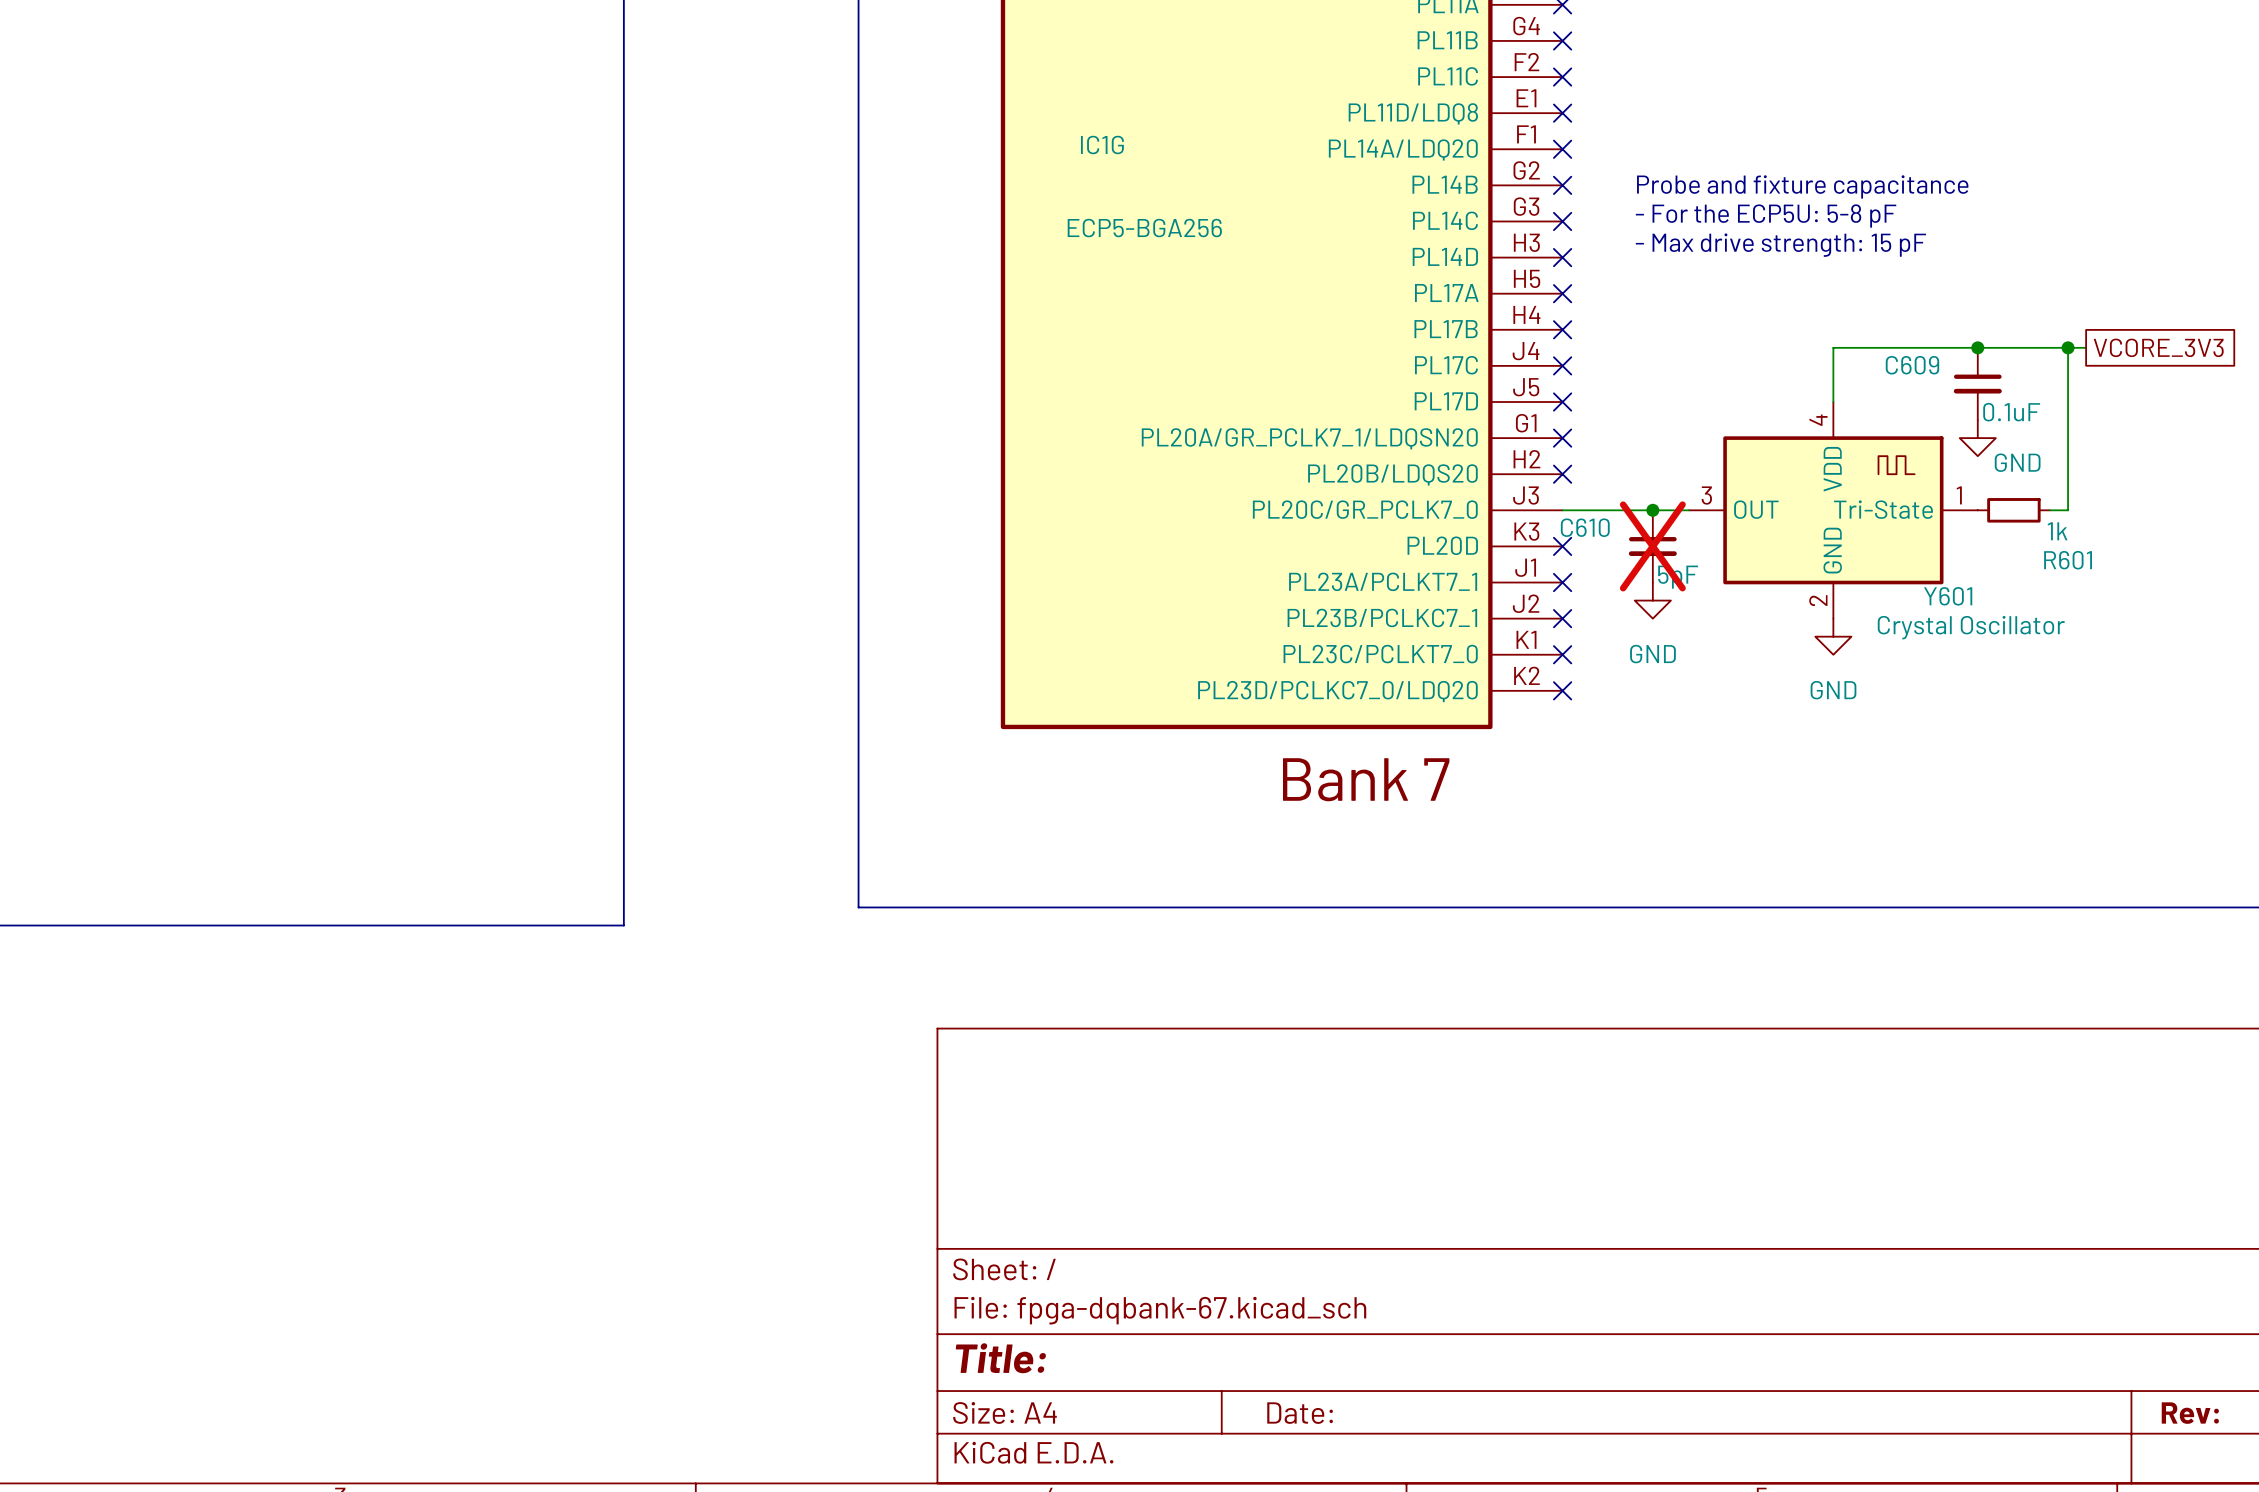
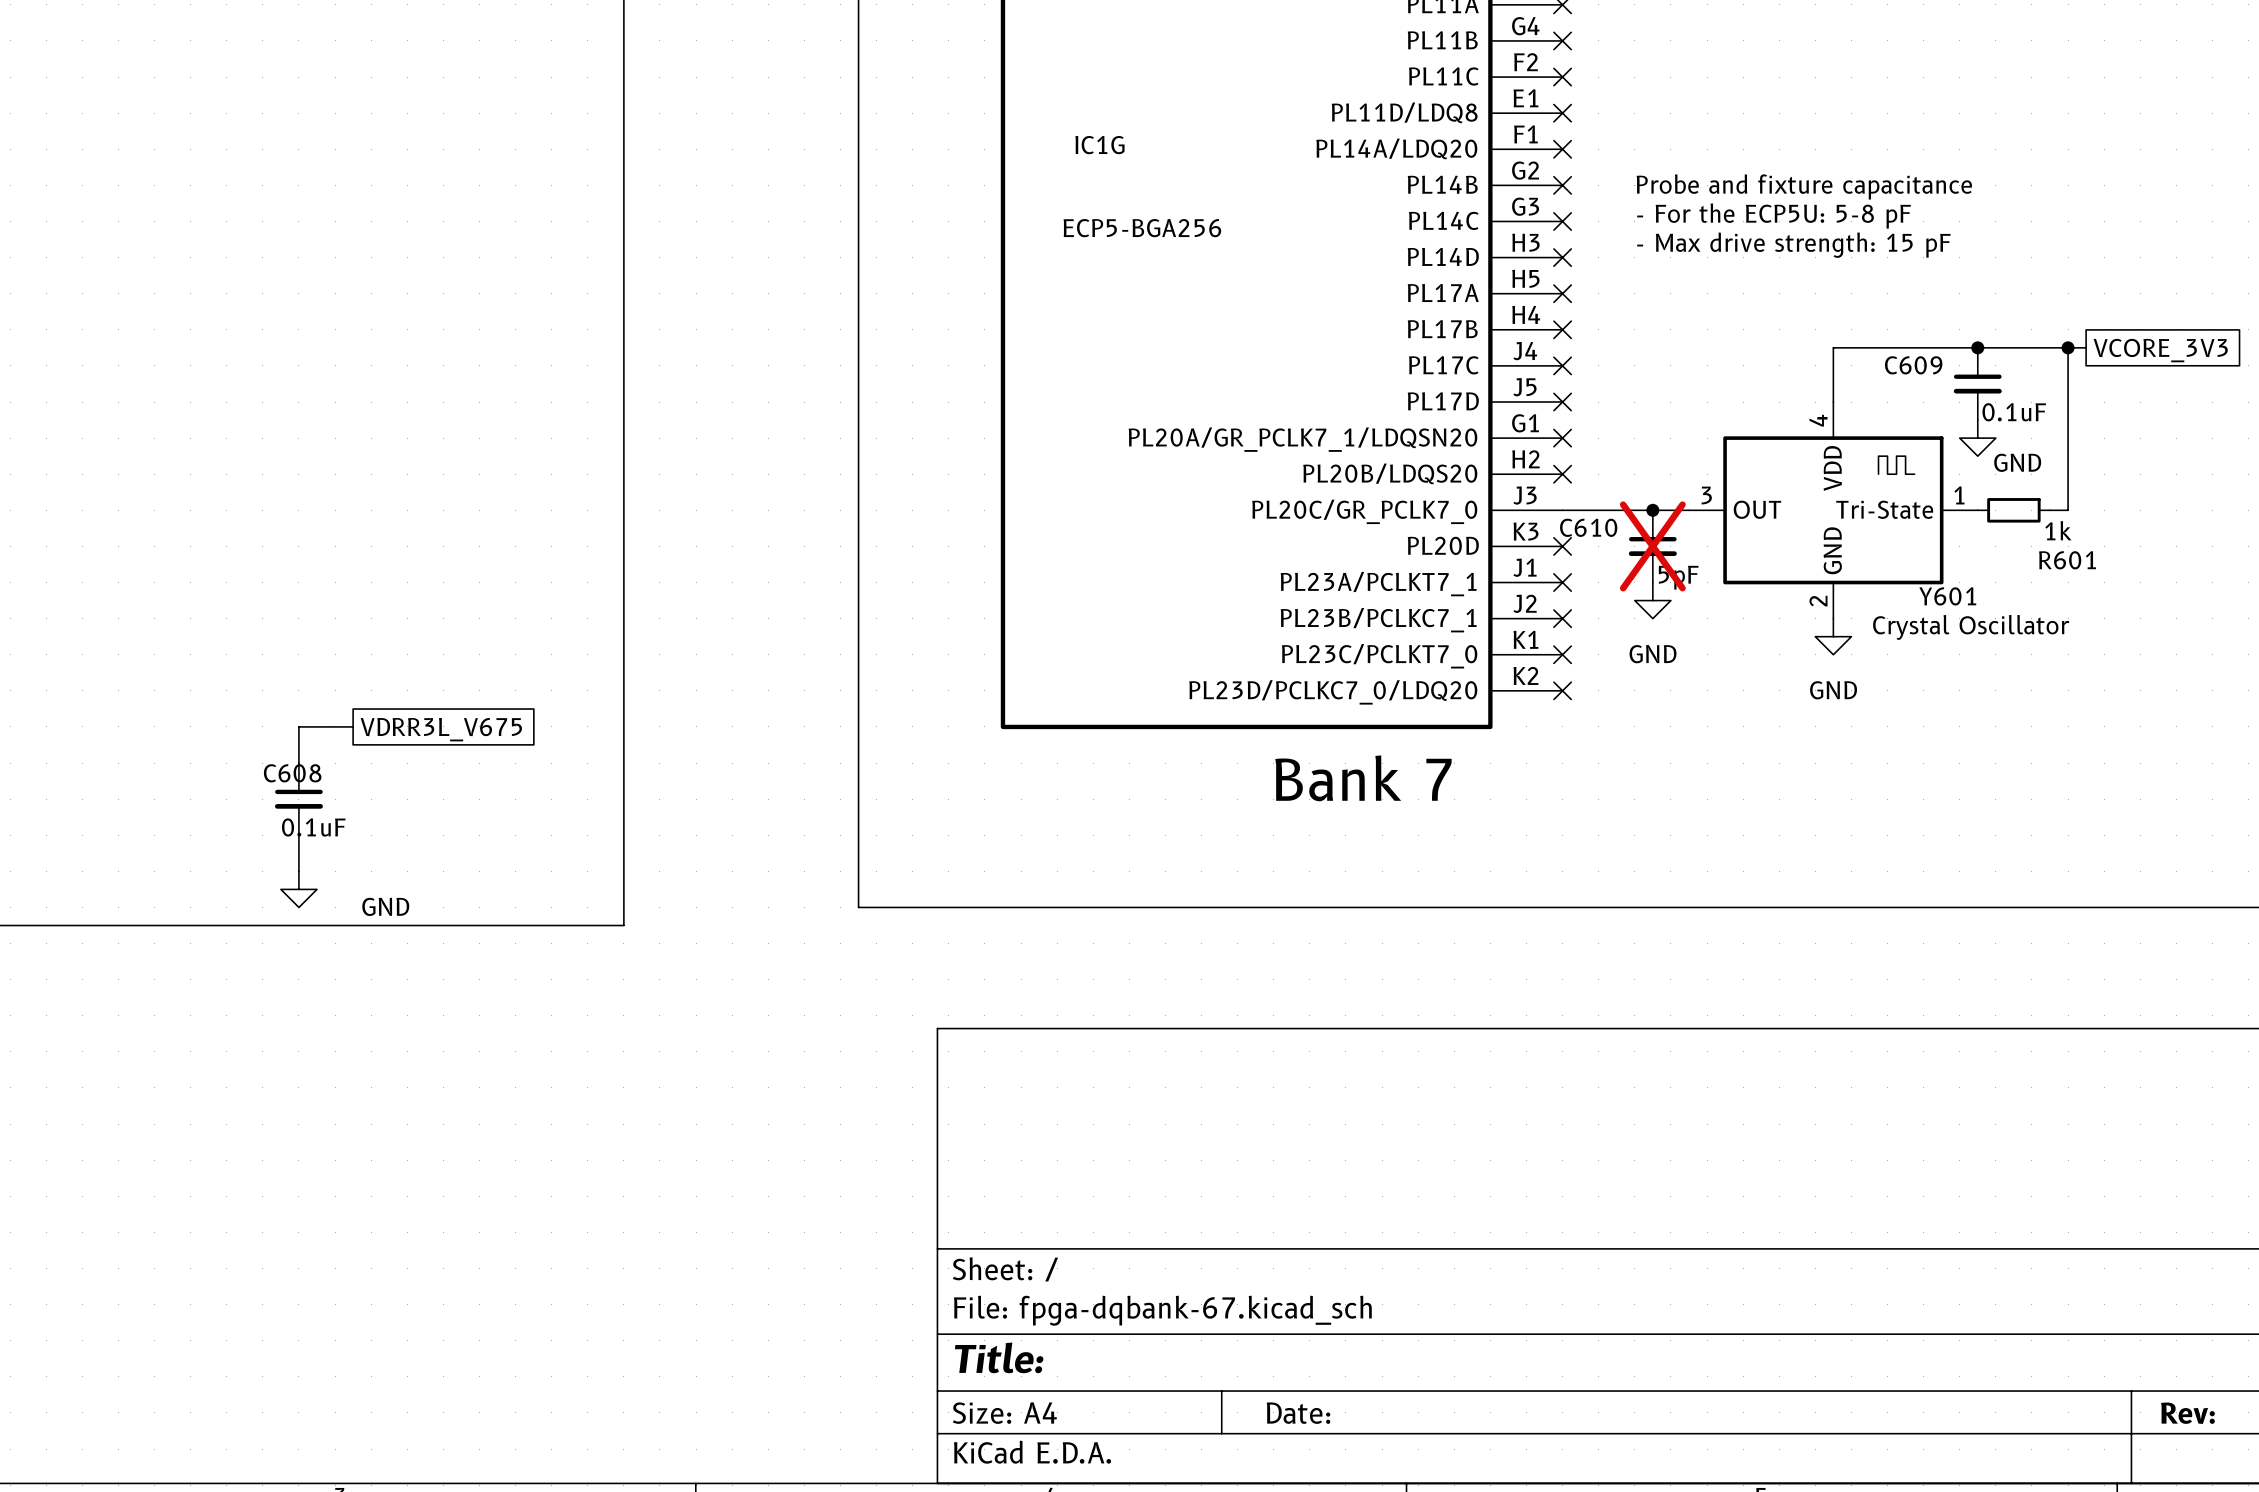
wire: none -> (353, 726) (298, 726) (298, 763)
global label: none -> VDRR3L_V675 (441, 729)
C608: none -> 0.1uF (298, 799)
wire: none -> (298, 835) (298, 871)
power symbol: none -> GND (298, 889)

